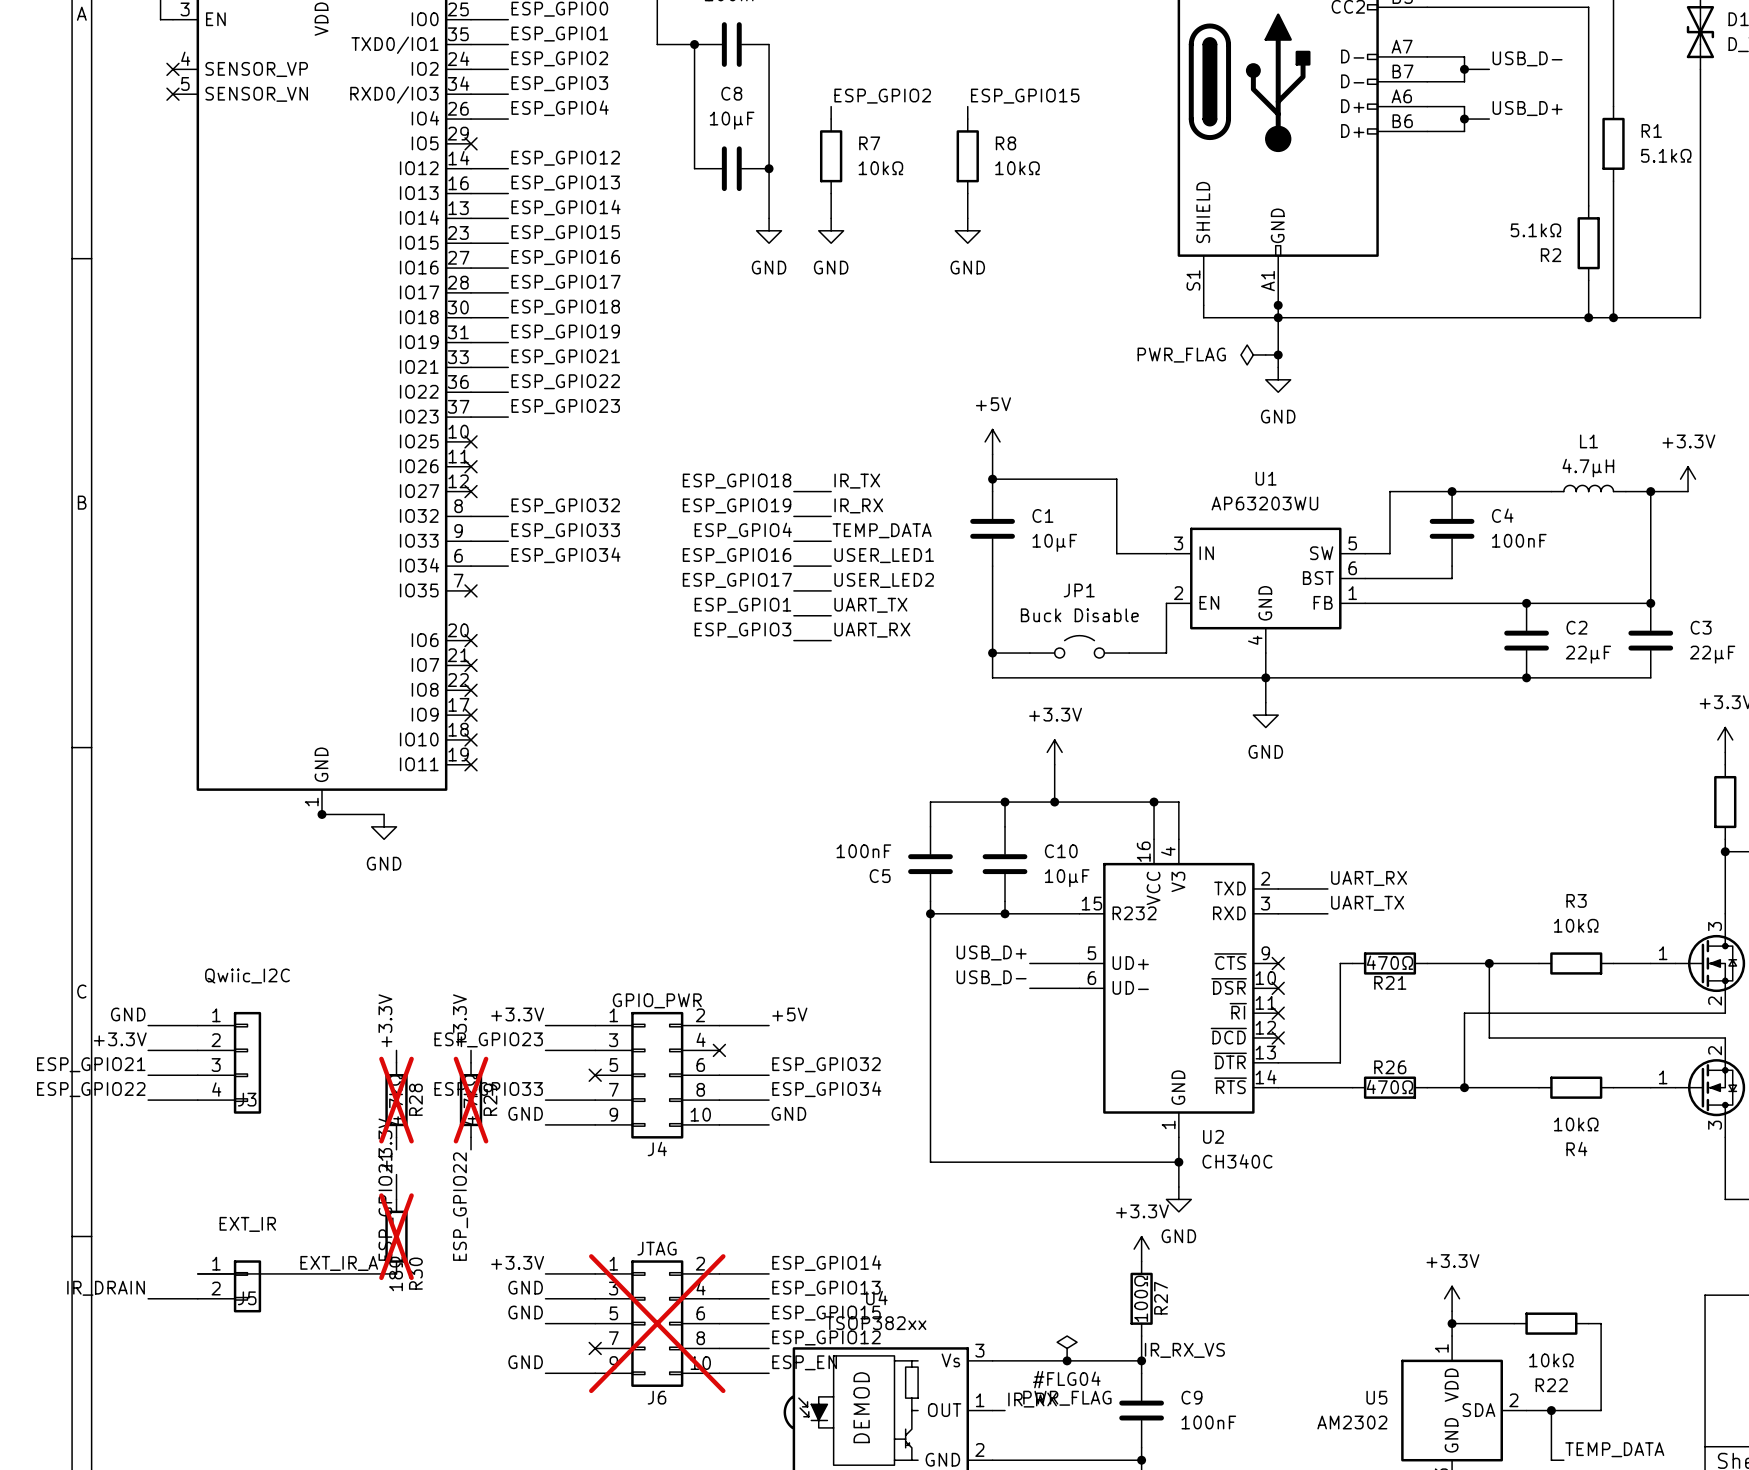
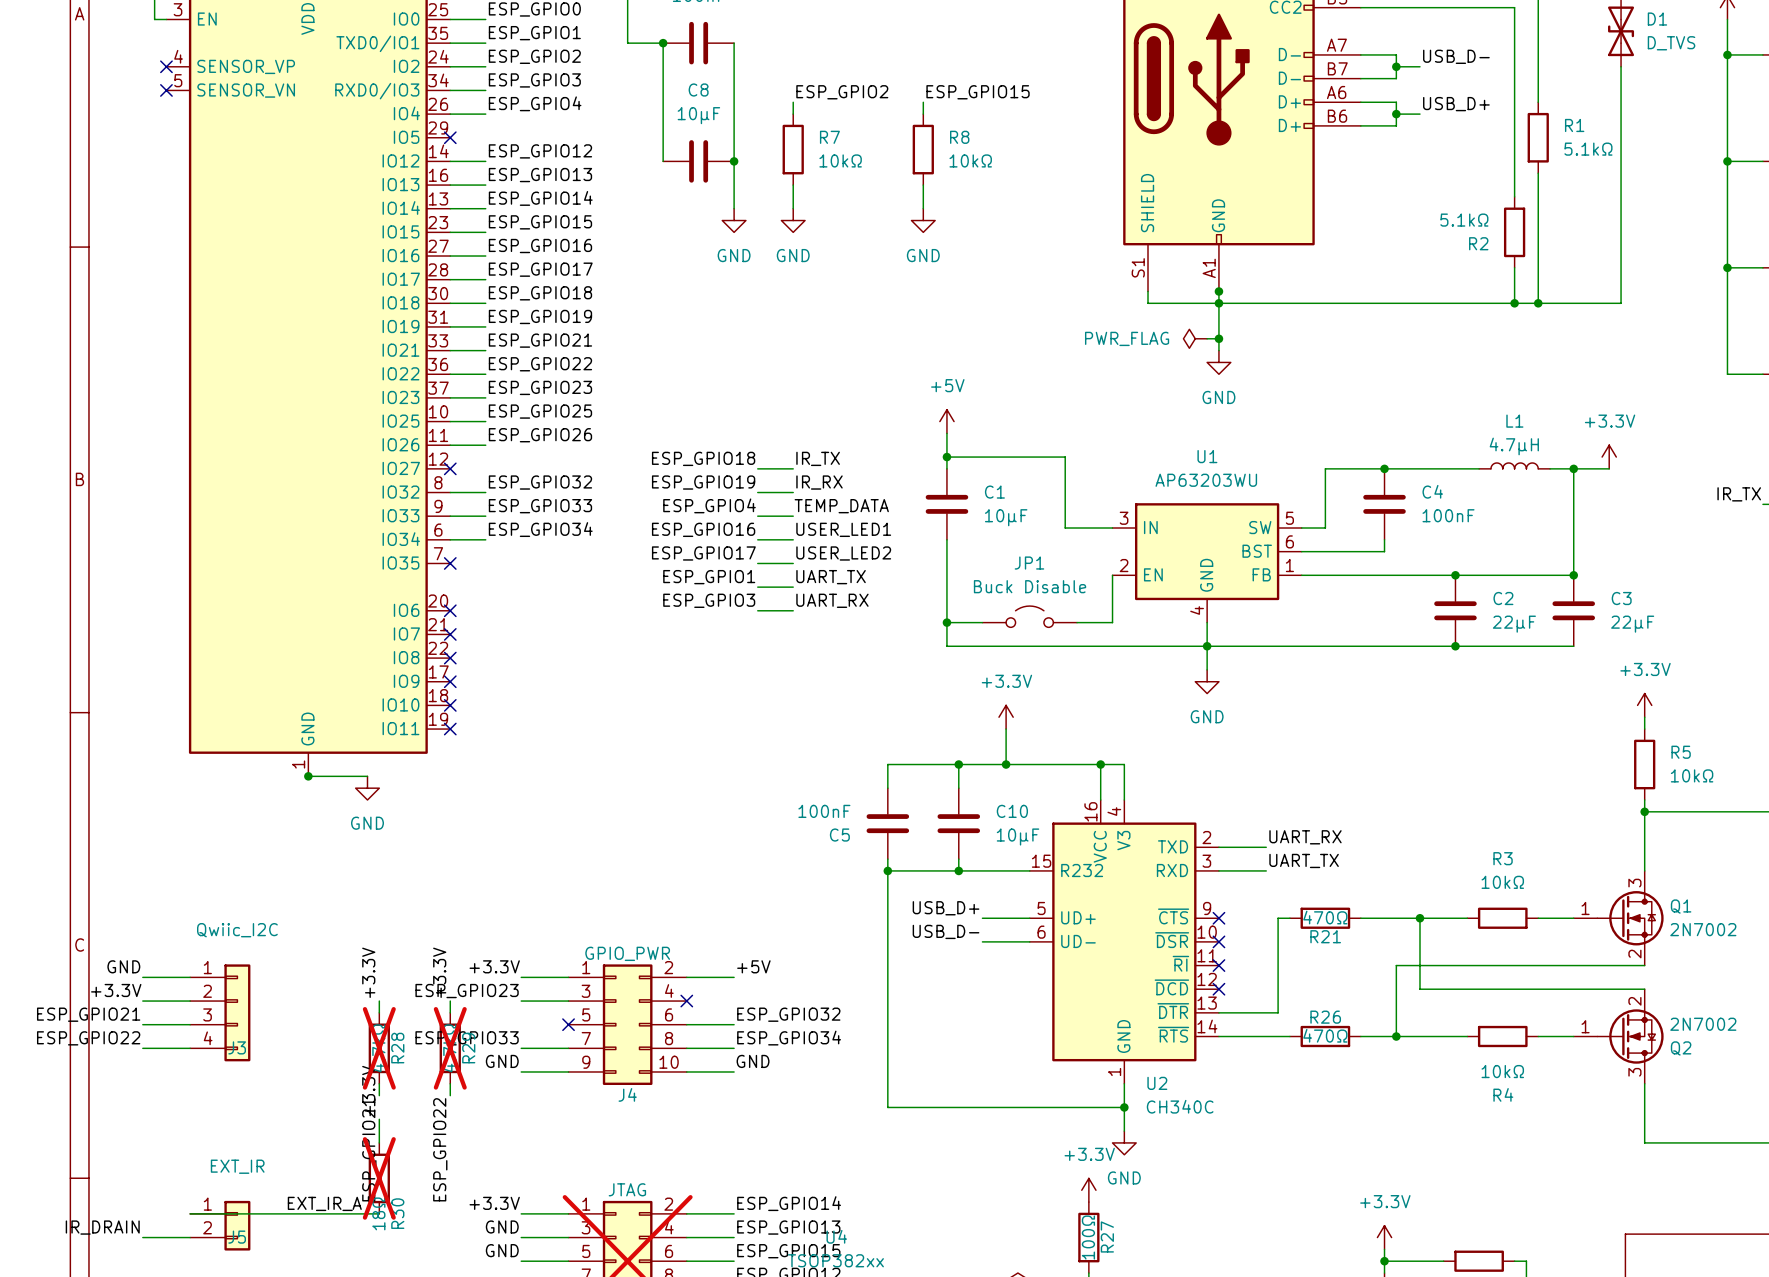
label: none -> ESP_GPIO25 (540, 411)
wire: none -> (450, 421) (485, 421)
no-connect mark: (471, 441) -> none
label: none -> ESP_GPIO26 (540, 435)
wire: none -> (450, 445) (485, 445)
no-connect mark: (471, 466) -> none

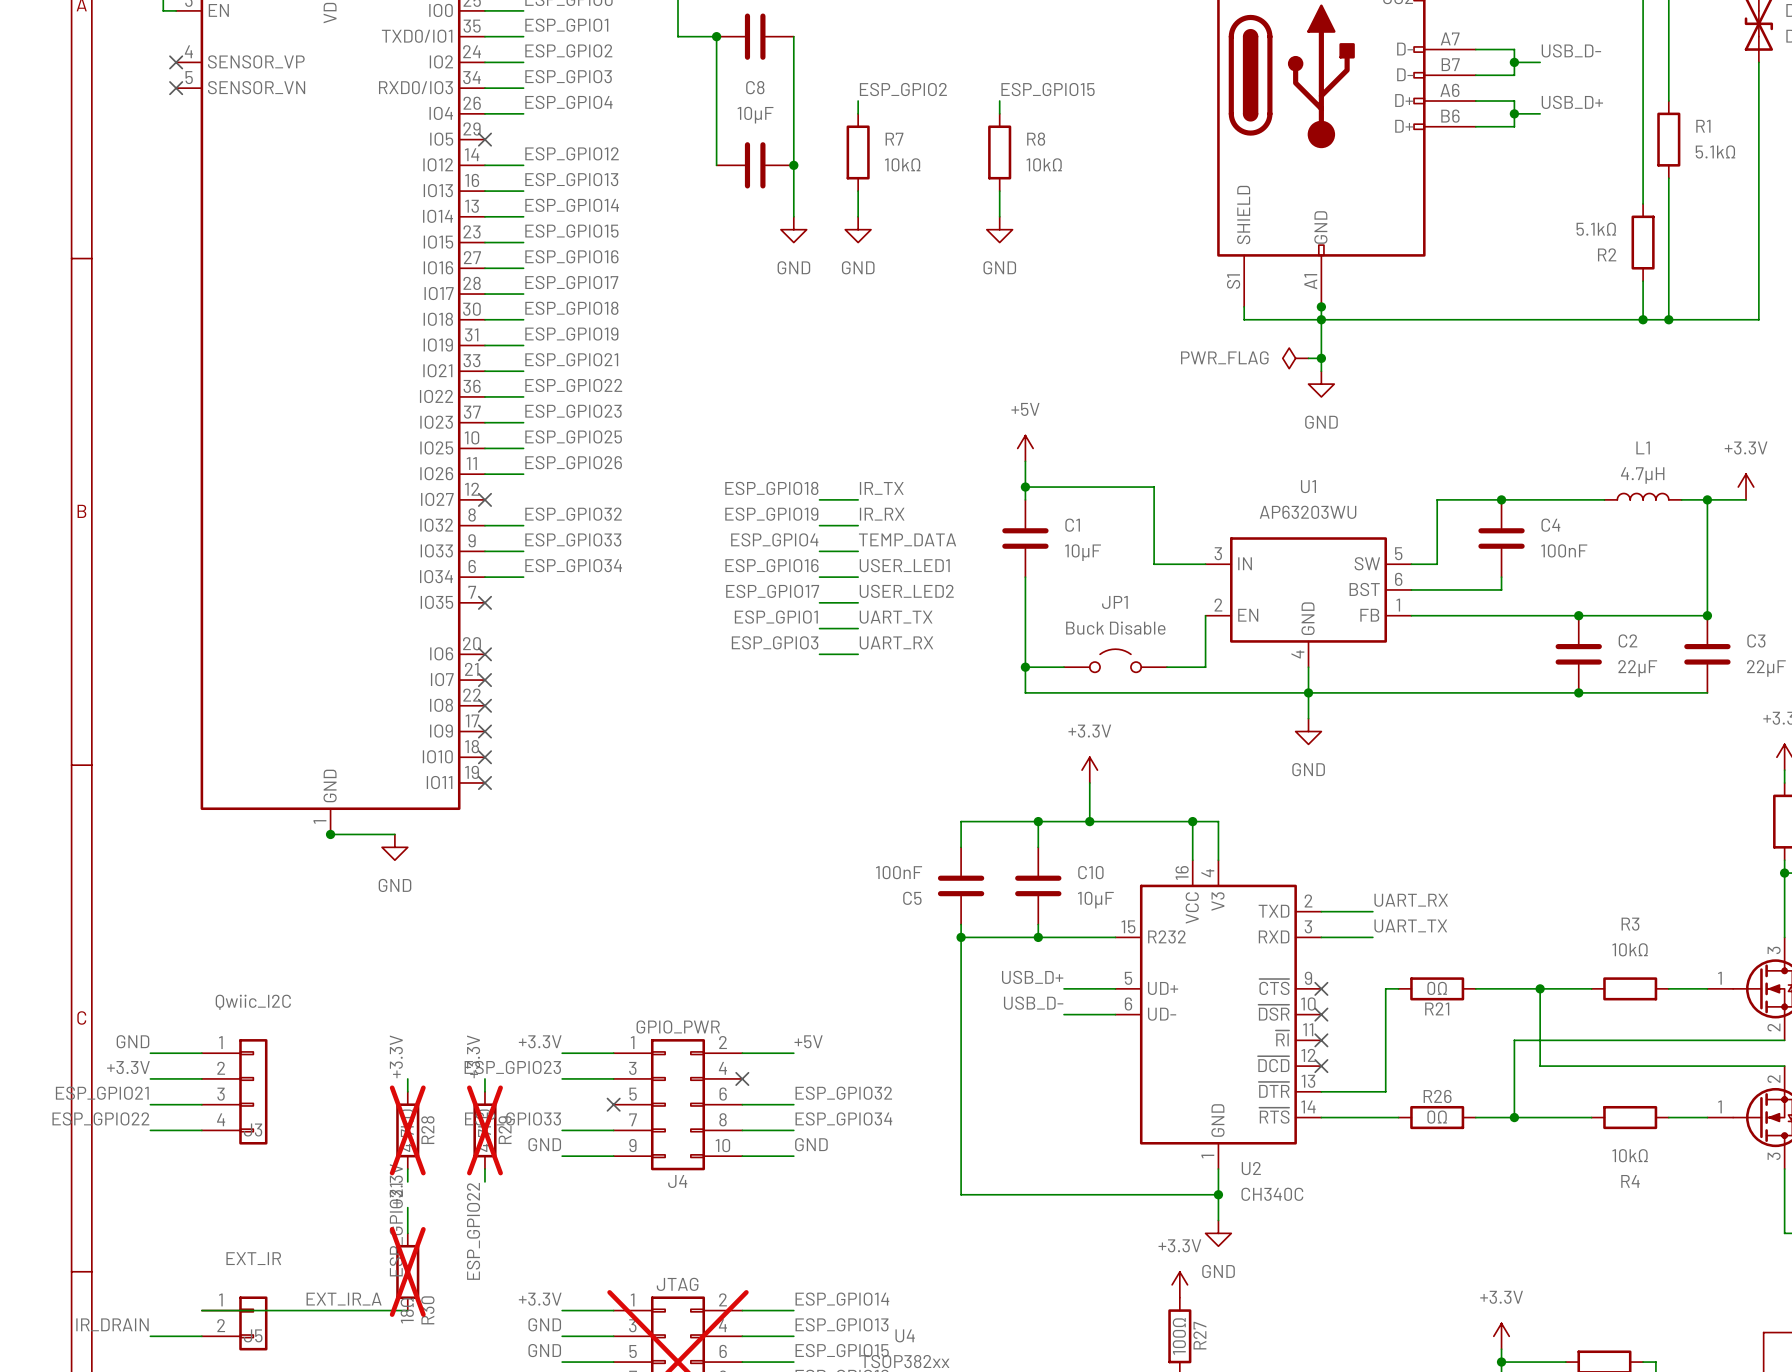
R21 value: 470Ω (1325, 917) -> 0Ω (1437, 988)
R26 value: 470Ω (1325, 1035) -> 0Ω (1437, 1117)

